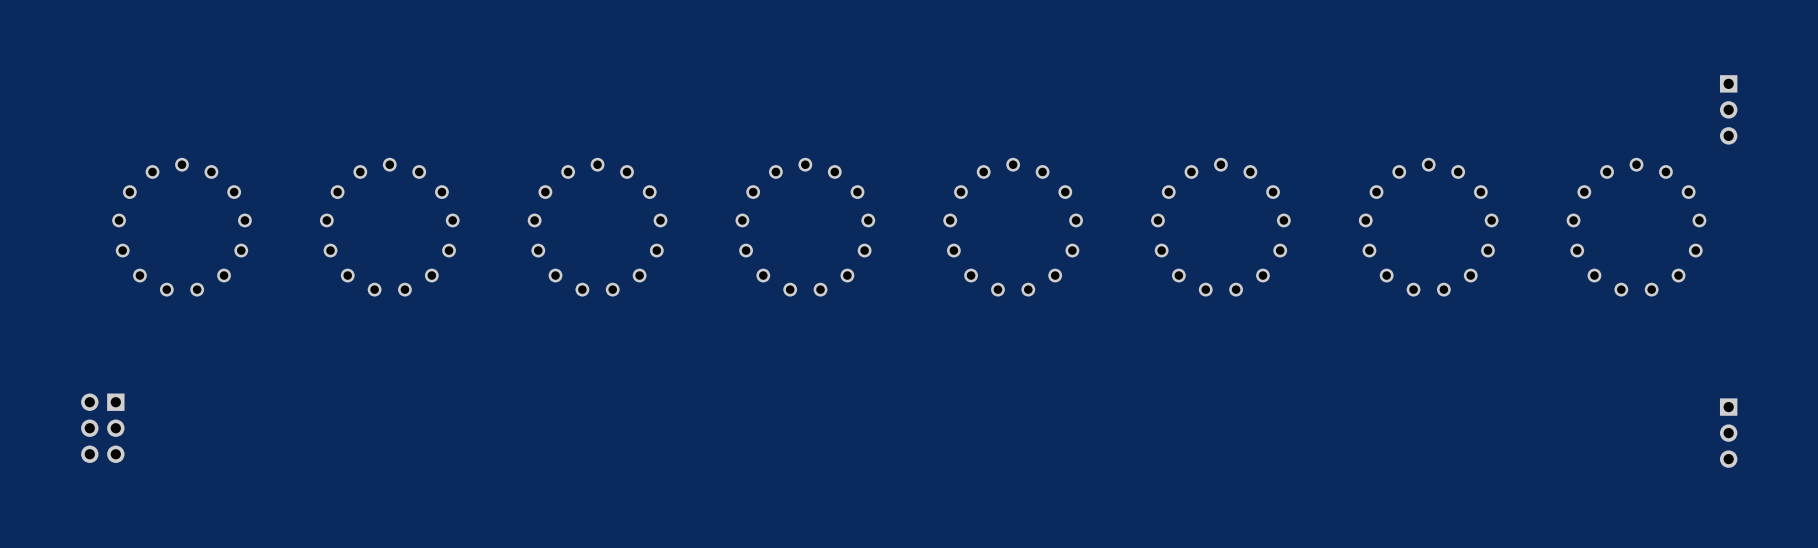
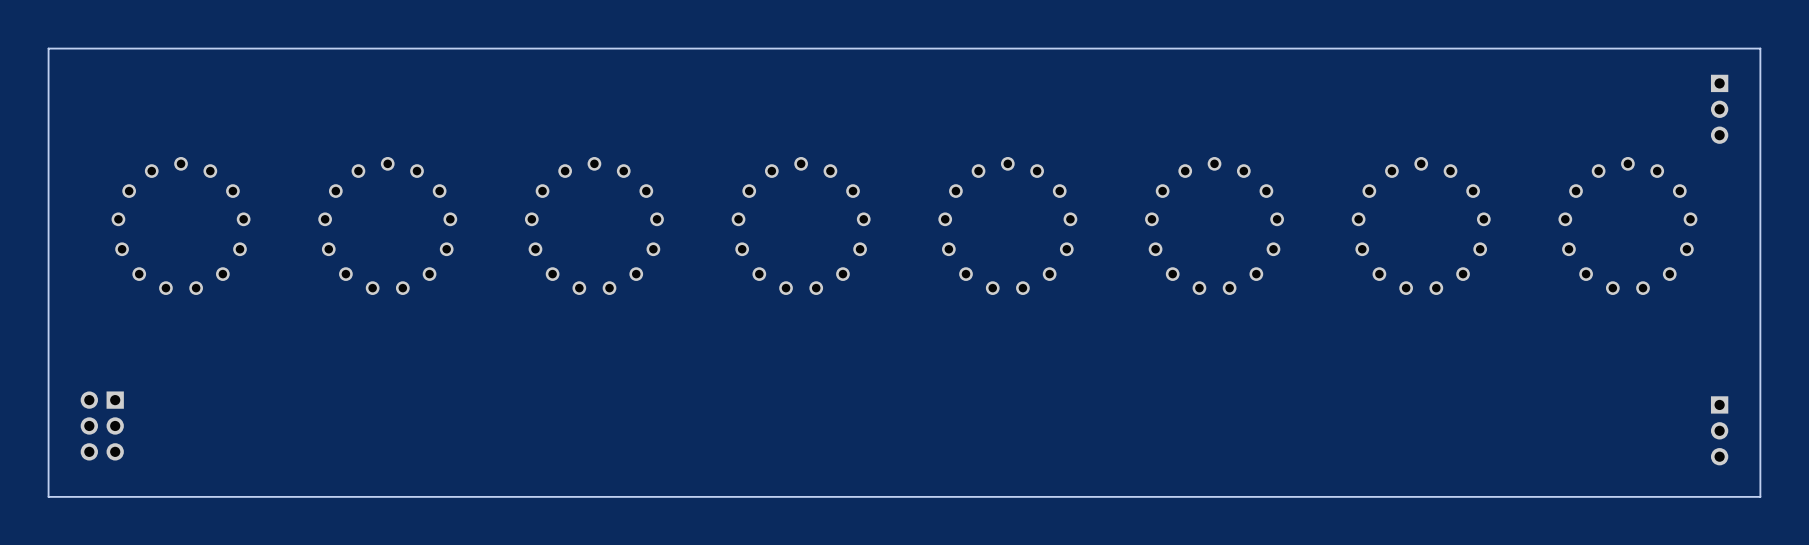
board edge: none -> (1760, 48) (48, 48) (48, 496) (1760, 496) (1760, 48)

